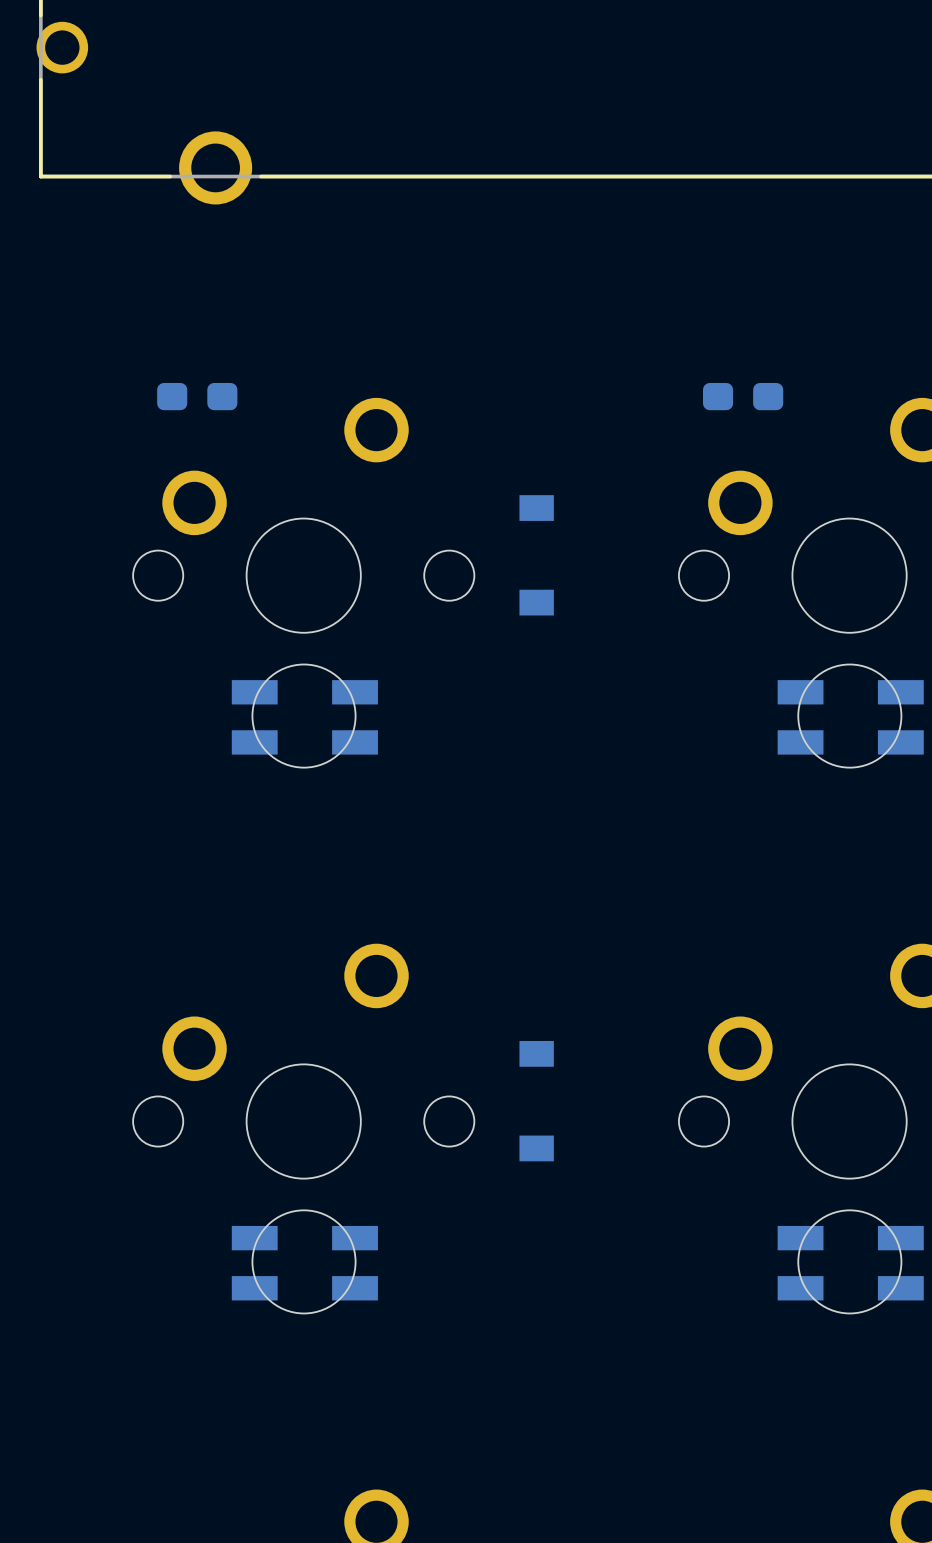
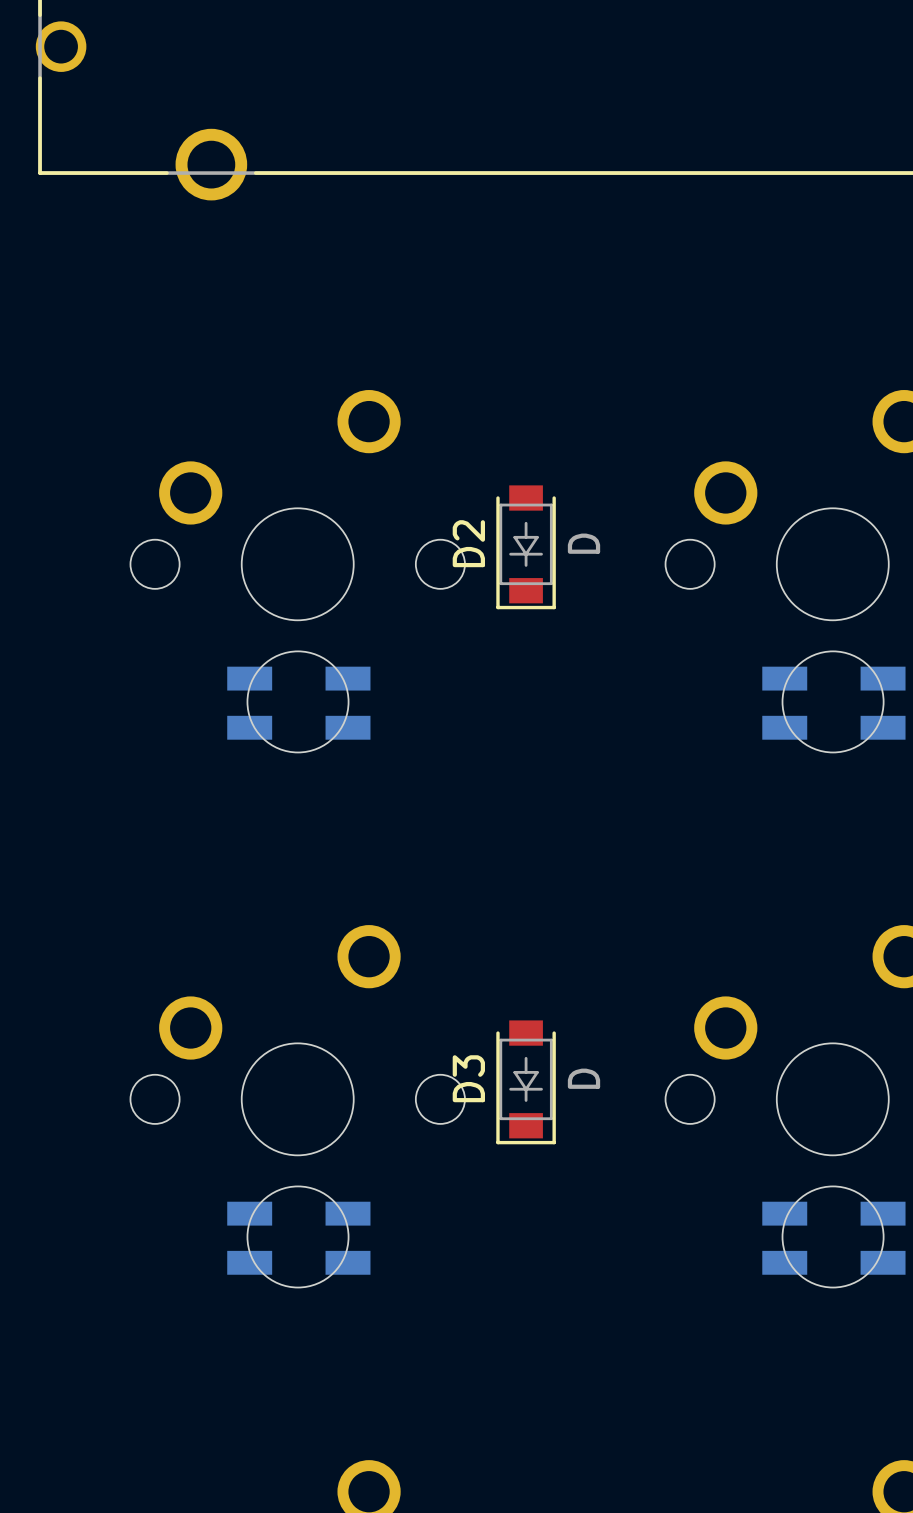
part: (197, 396) -> none
part: (743, 396) -> none
D2 side: bottom (536, 555) -> top (526, 547)
D3 side: bottom (536, 1101) -> top (526, 1082)

